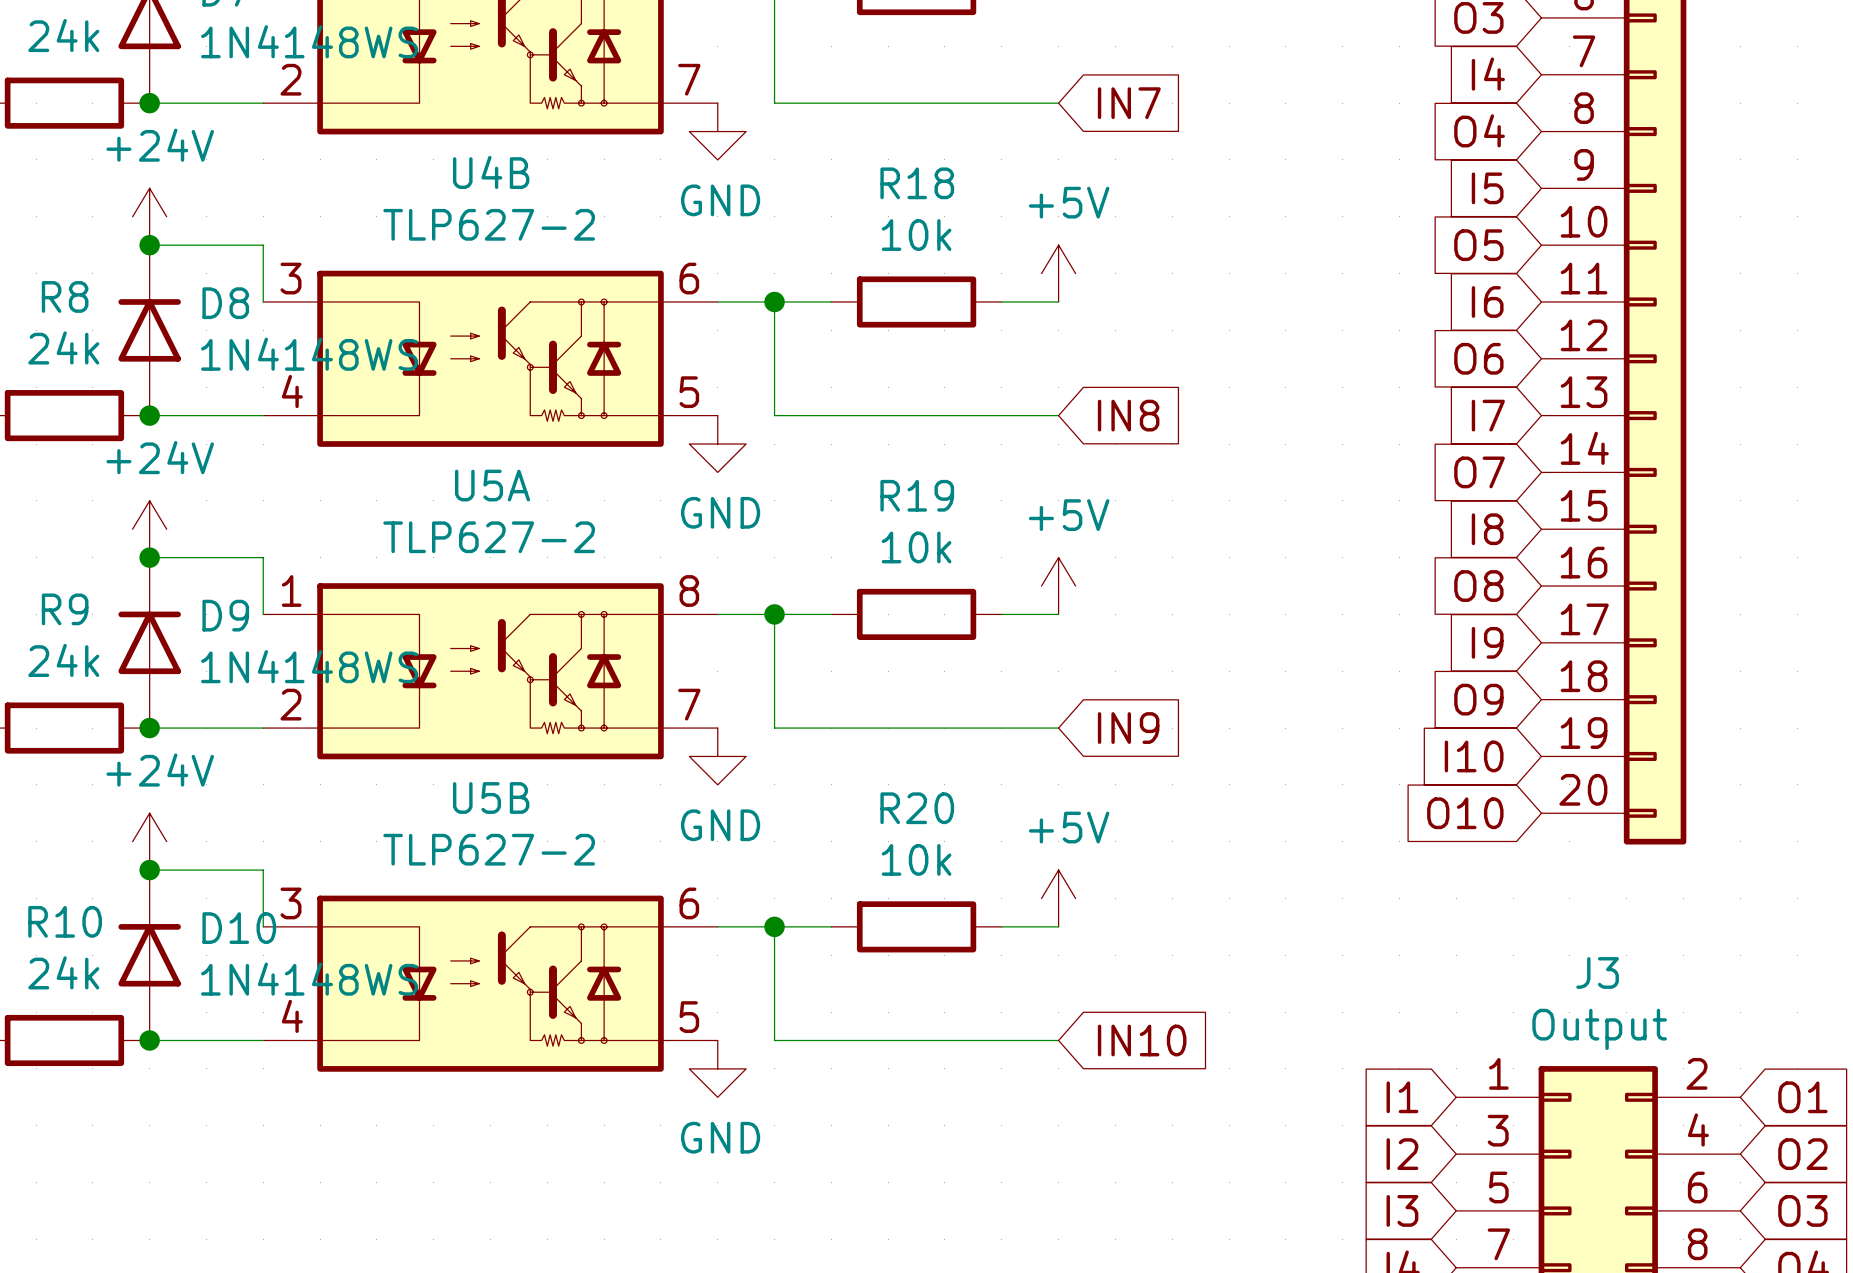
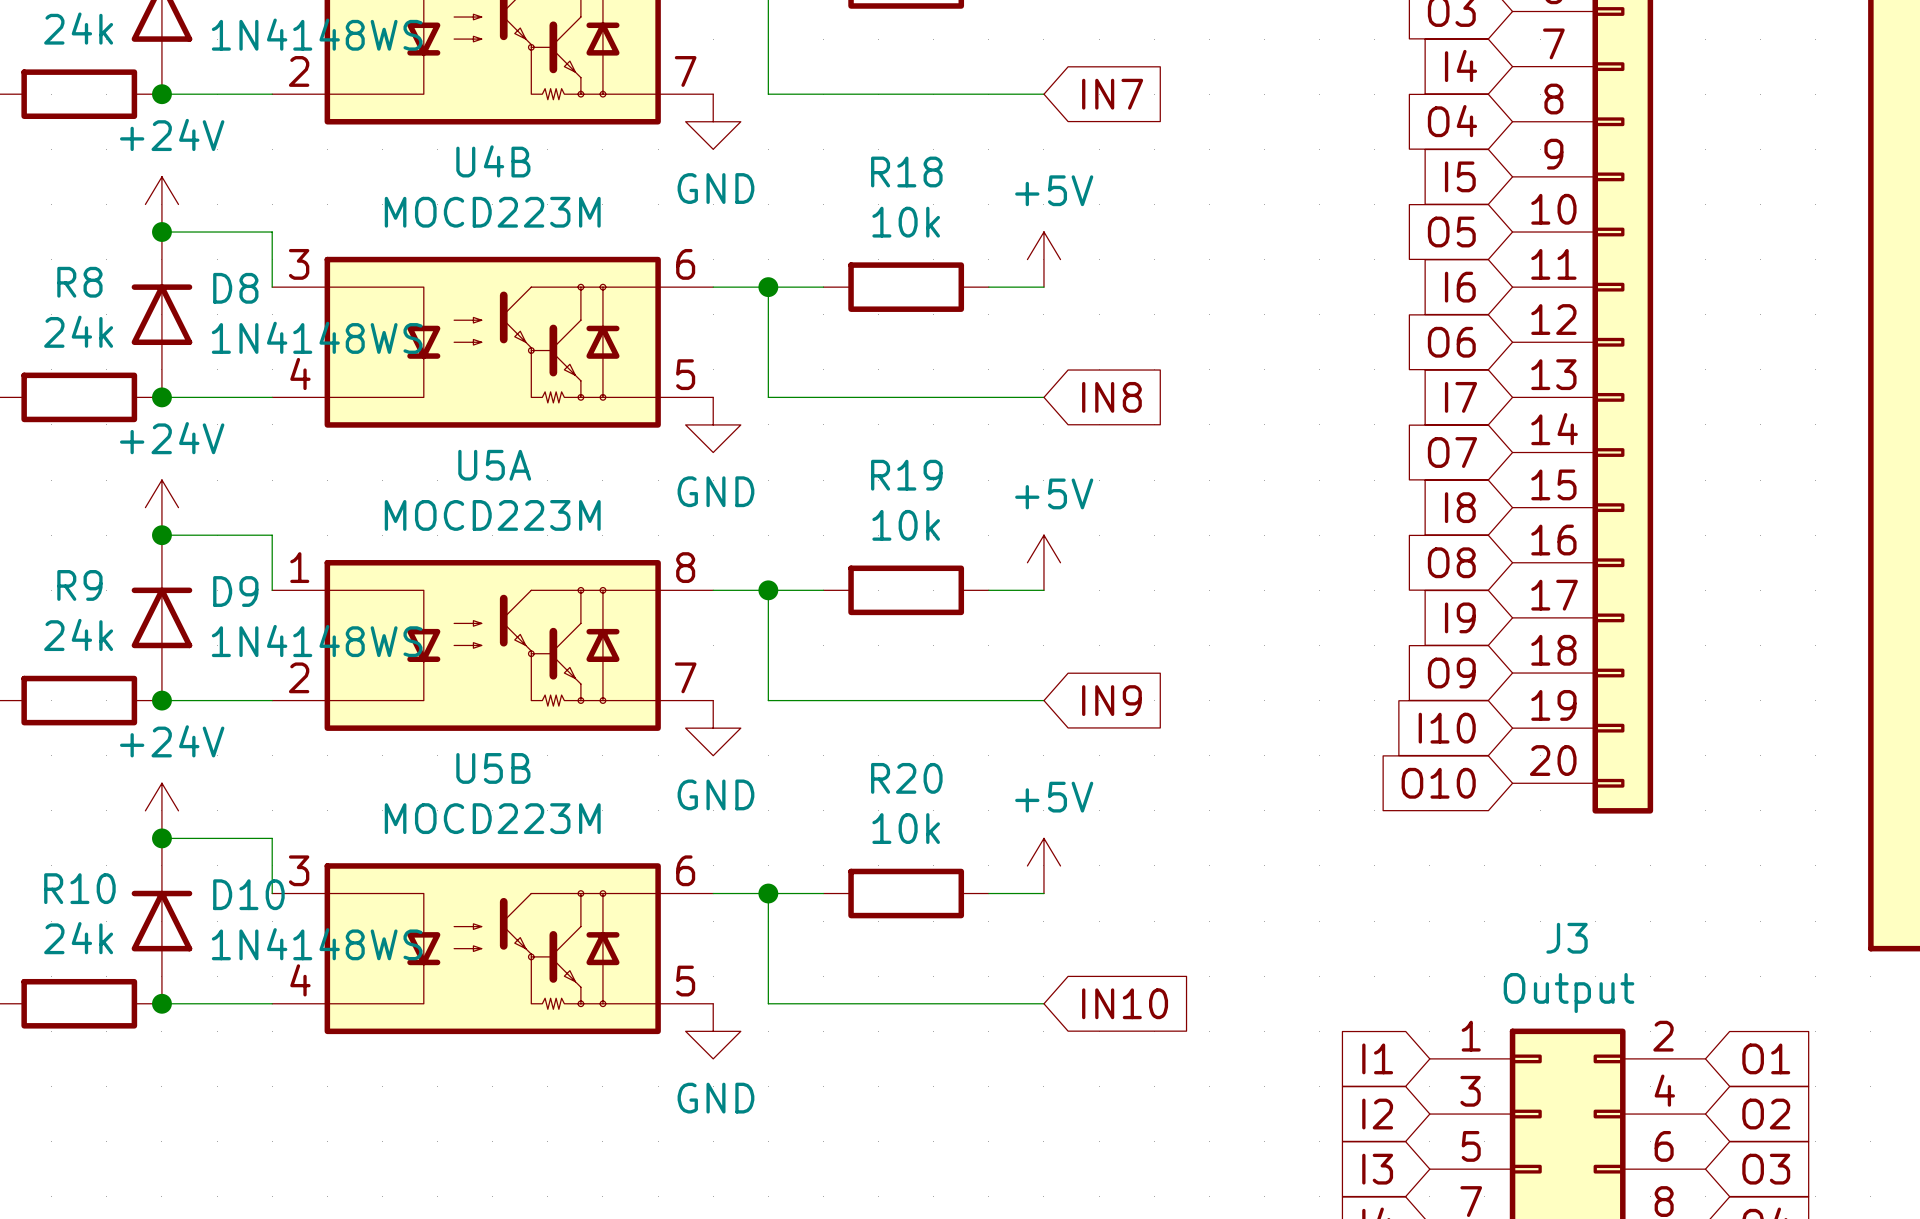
U4B value: TLP627-2 (489, 224) -> MOCD223M (492, 212)
U5A value: TLP627-2 (489, 537) -> MOCD223M (492, 515)
U5B value: TLP627-2 (489, 849) -> MOCD223M (492, 818)

